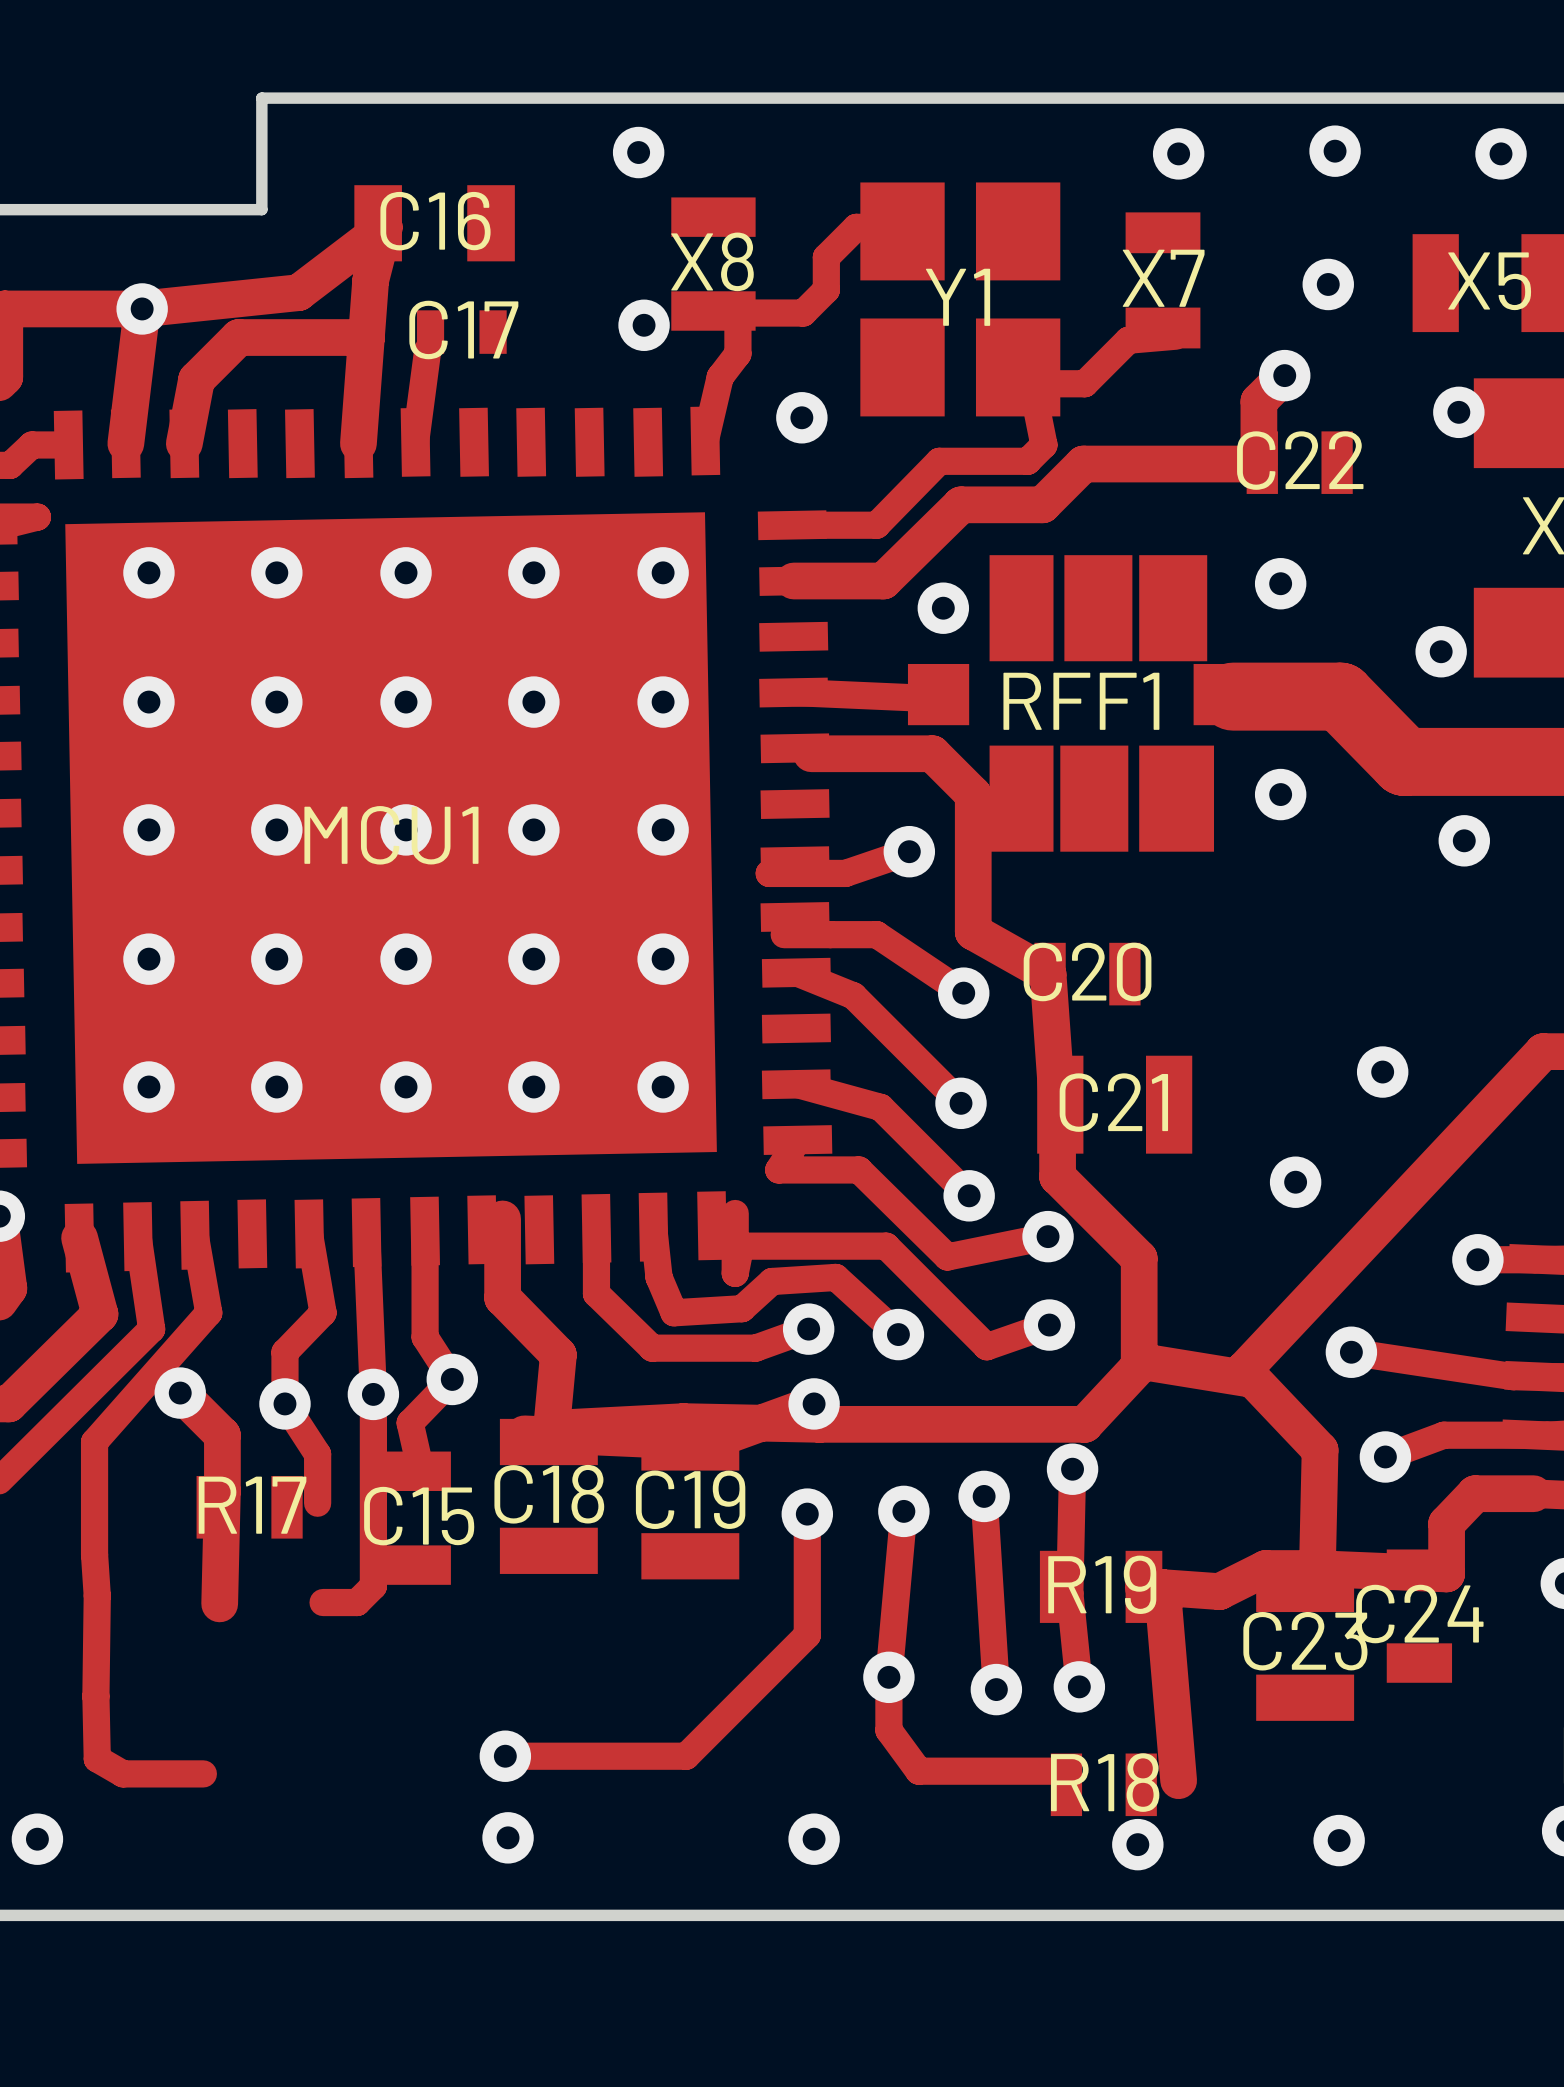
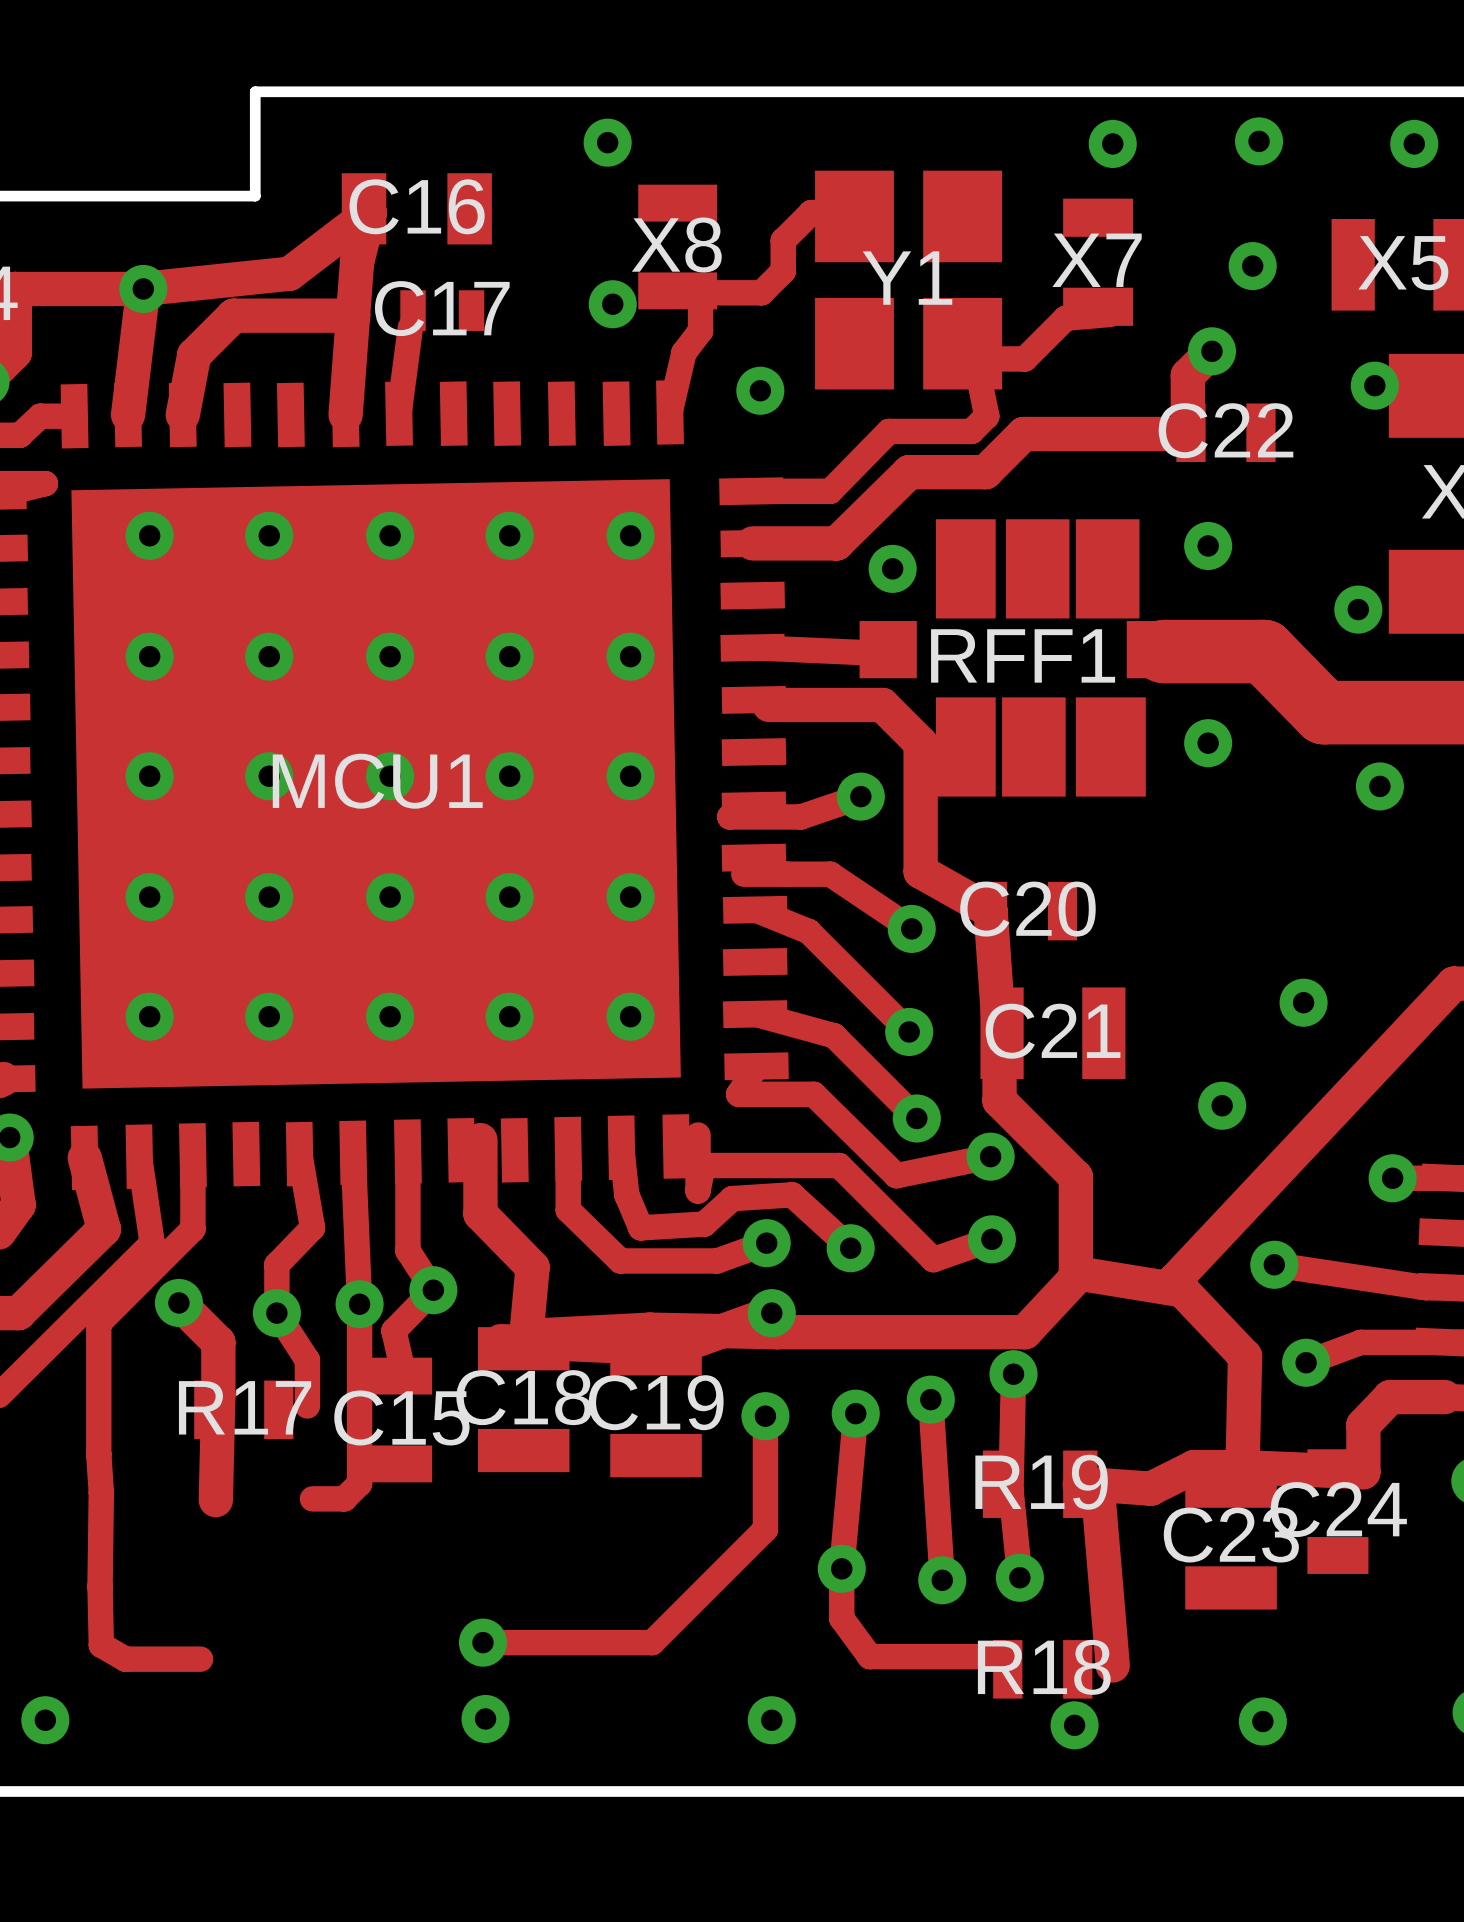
track: (195, 1235) (208, 1312) (94, 1442) -> (192, 1155) (192, 1229) (98, 1323) (98, 1348)

